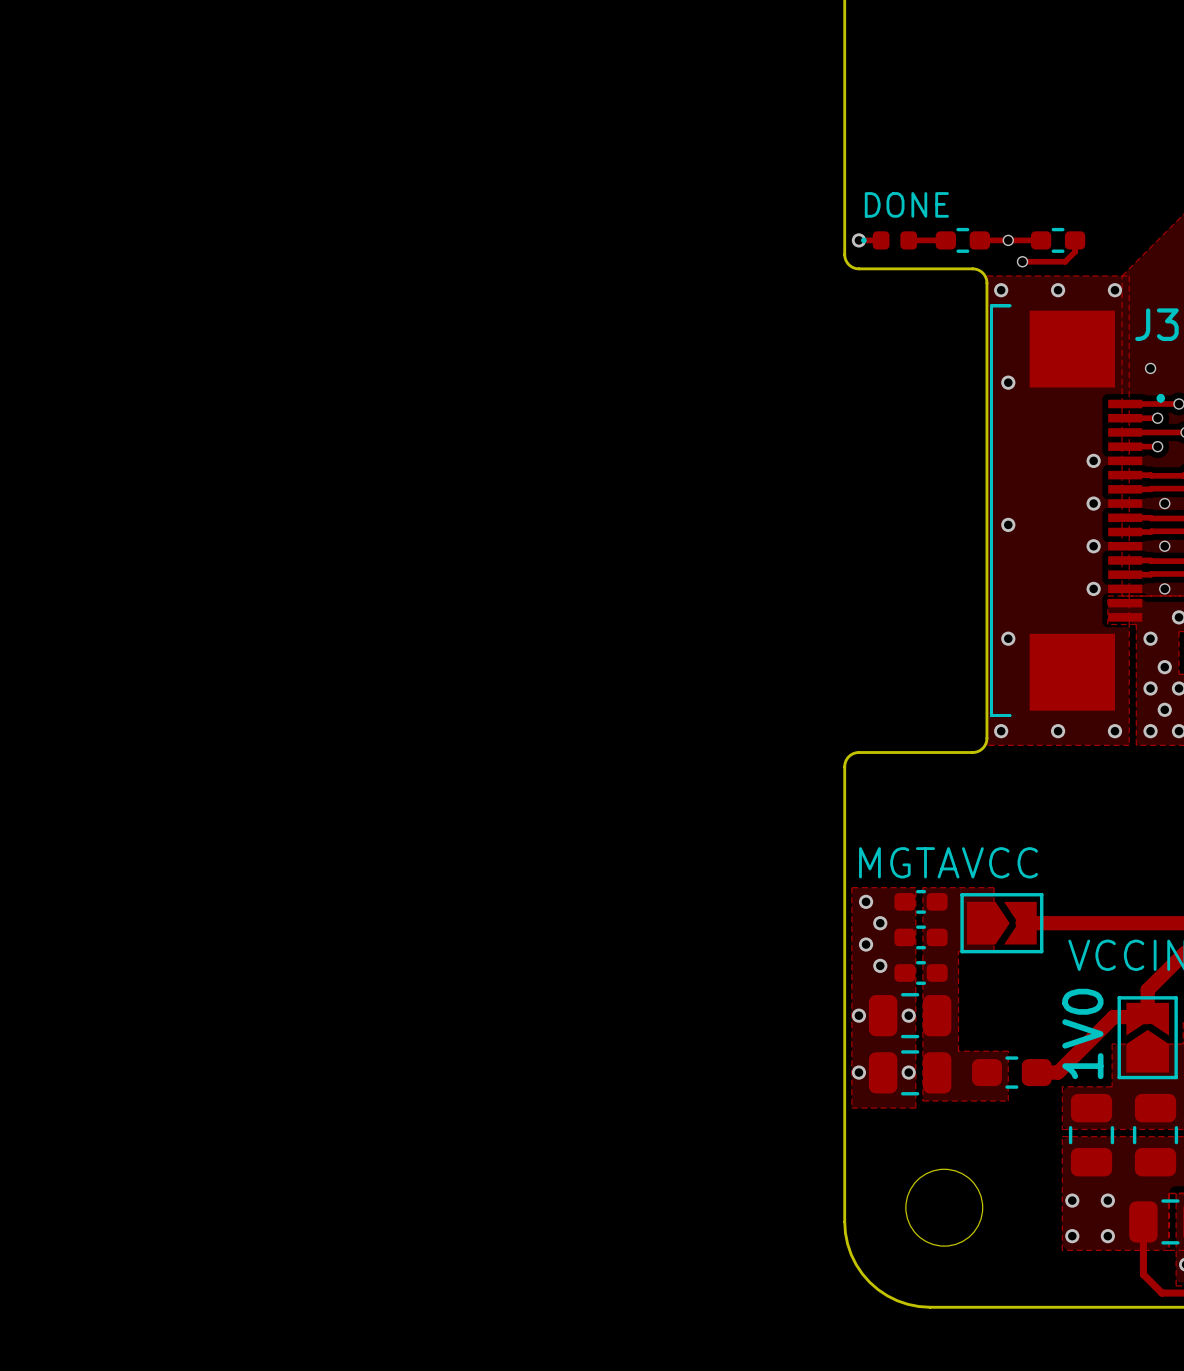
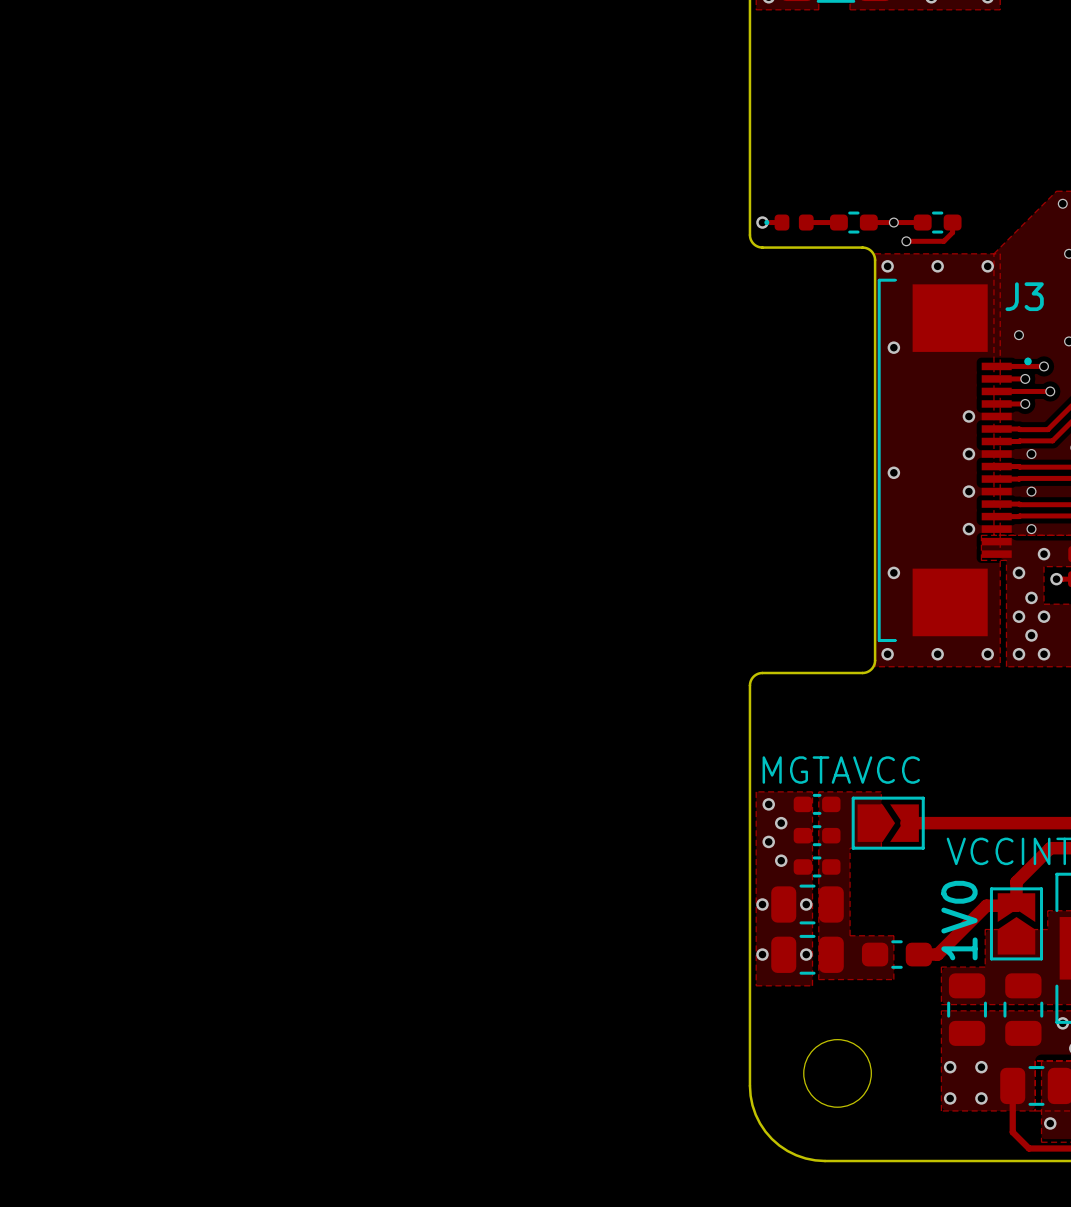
text: DONE (906, 204) -> none

